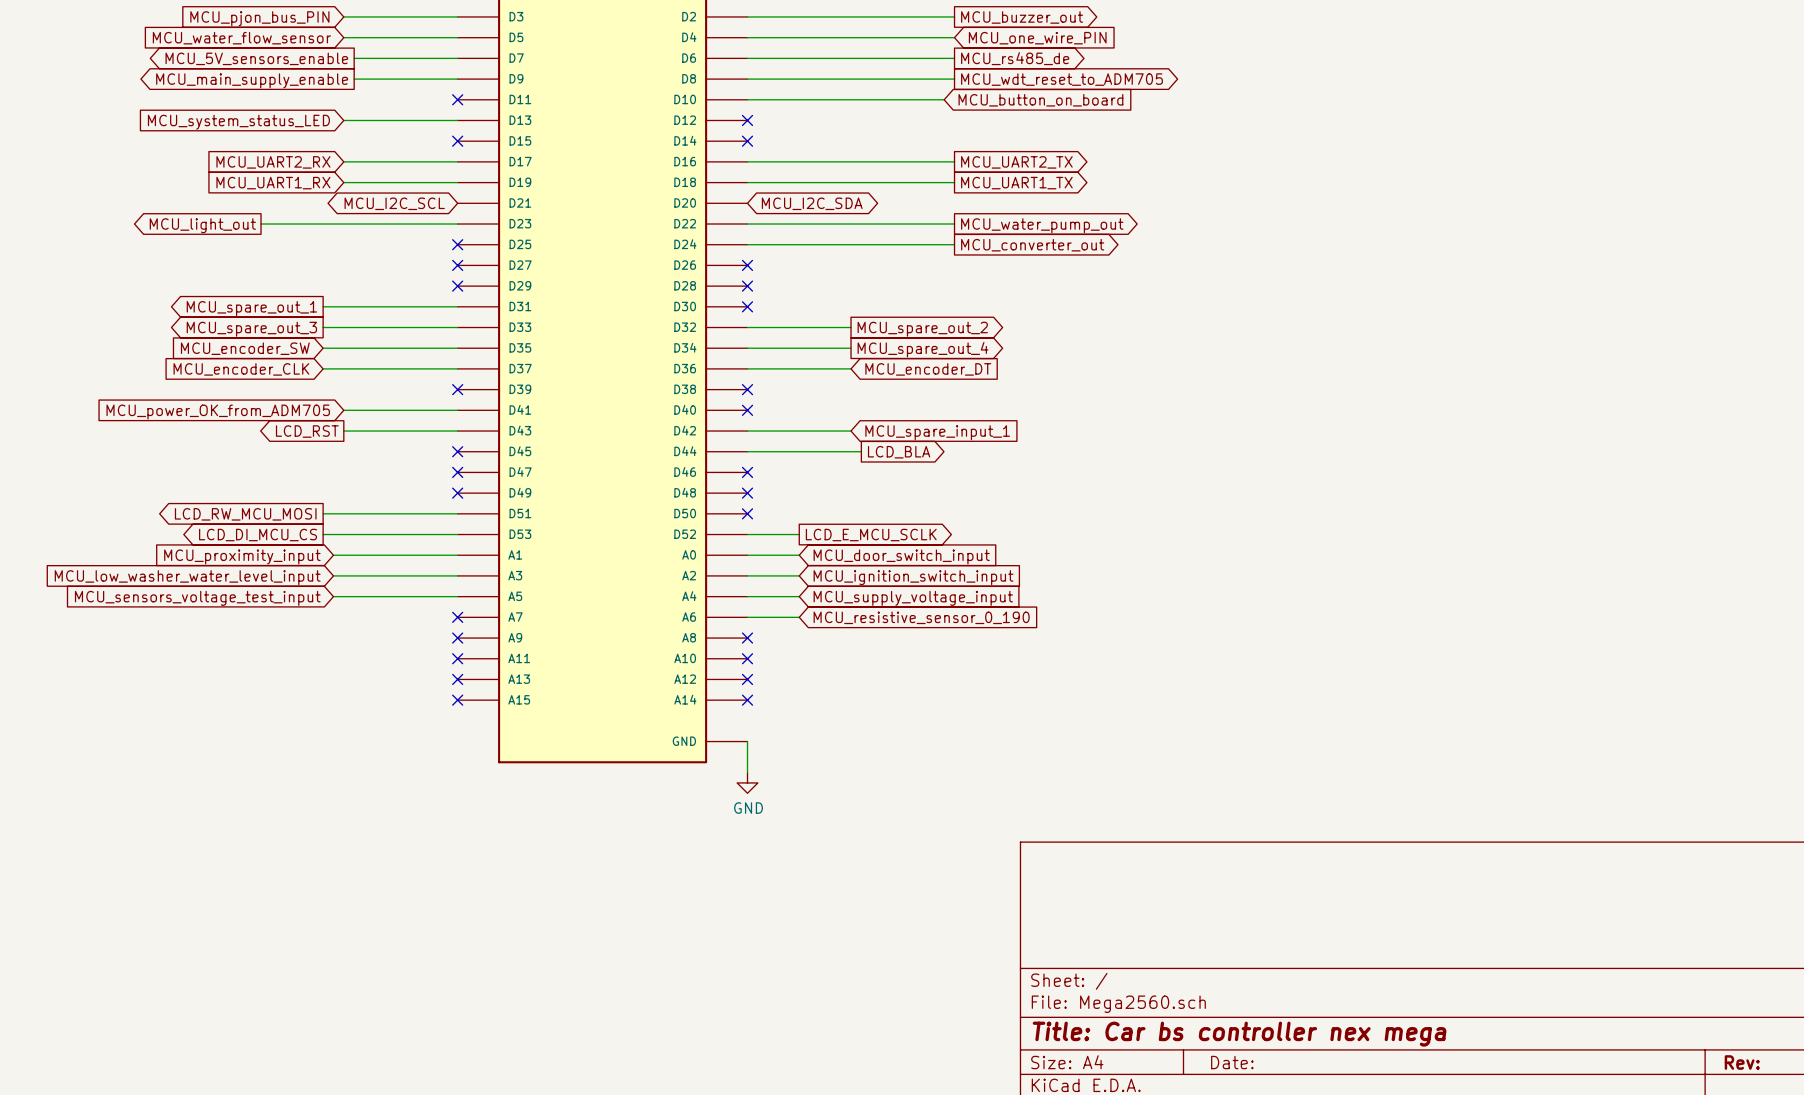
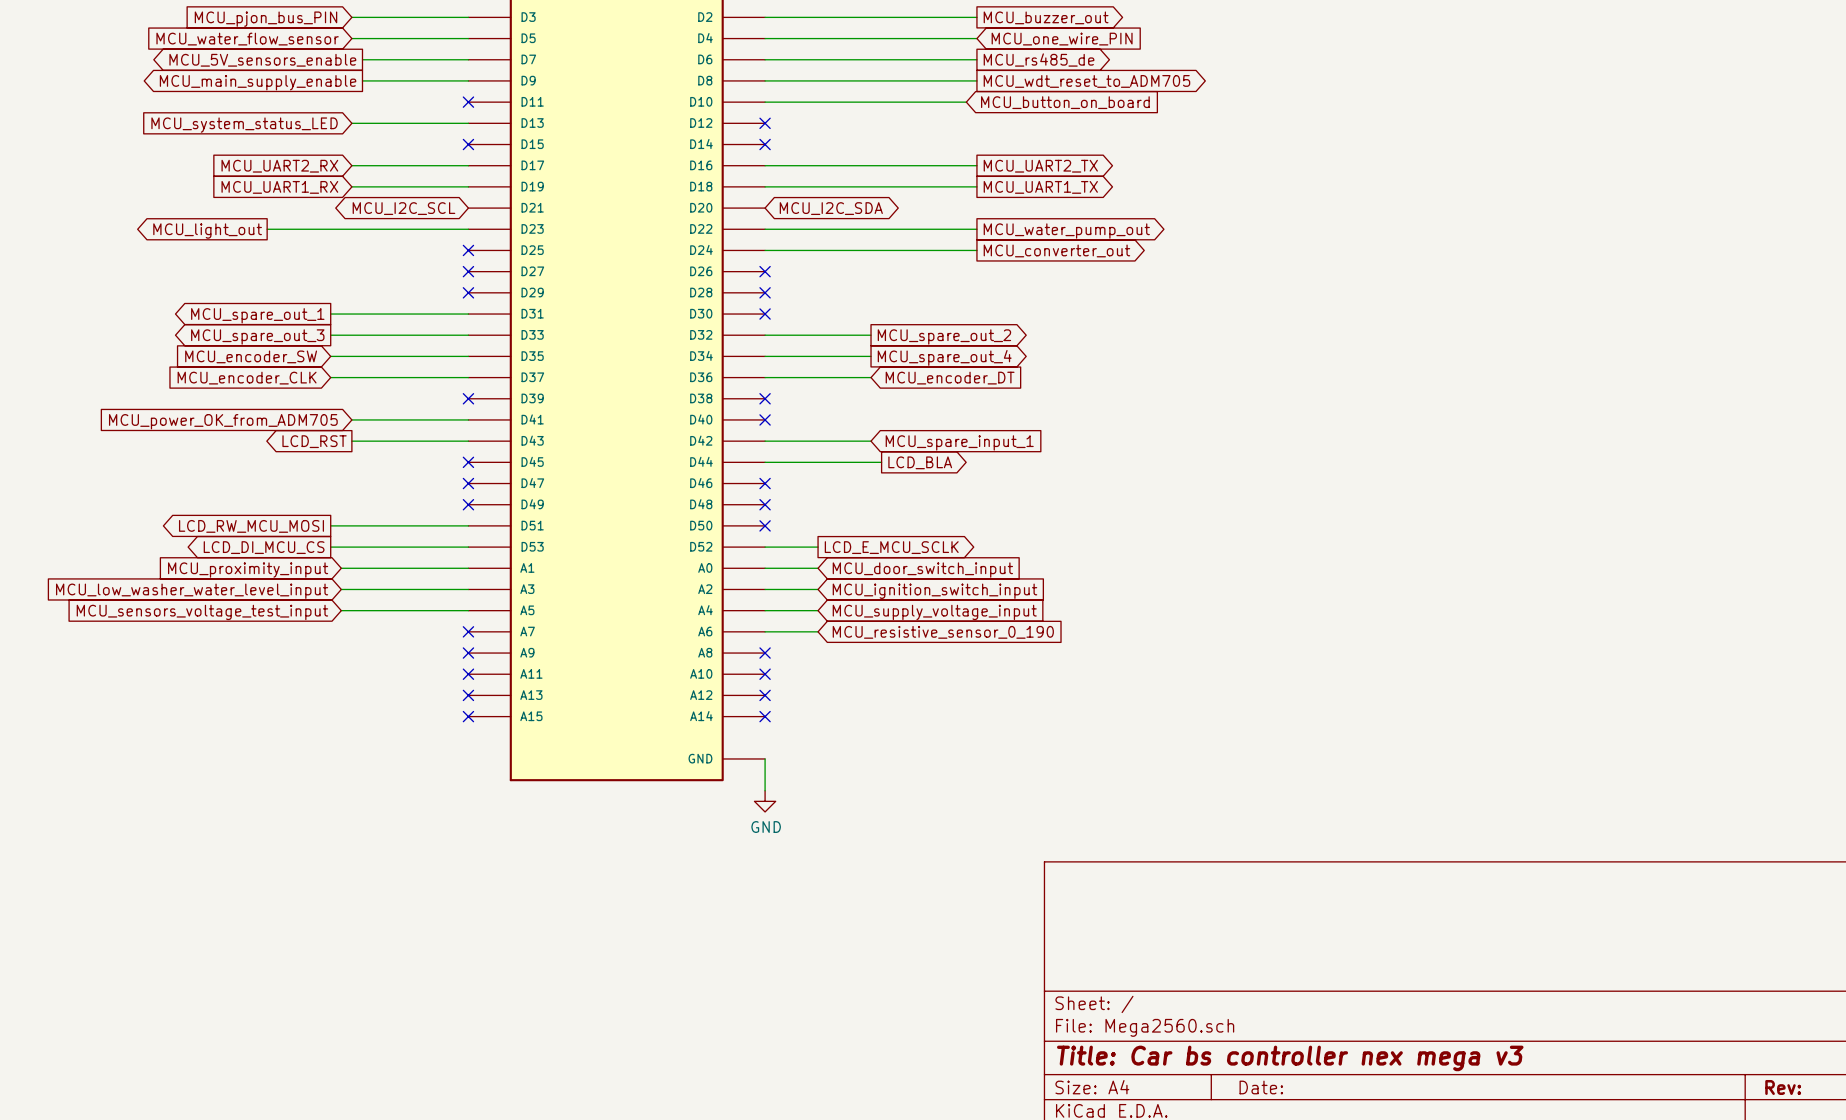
title block: Title: Car bs controller nex mega (1239, 1034) -> Title: Car bs controller nex mega v3 (1290, 1058)

